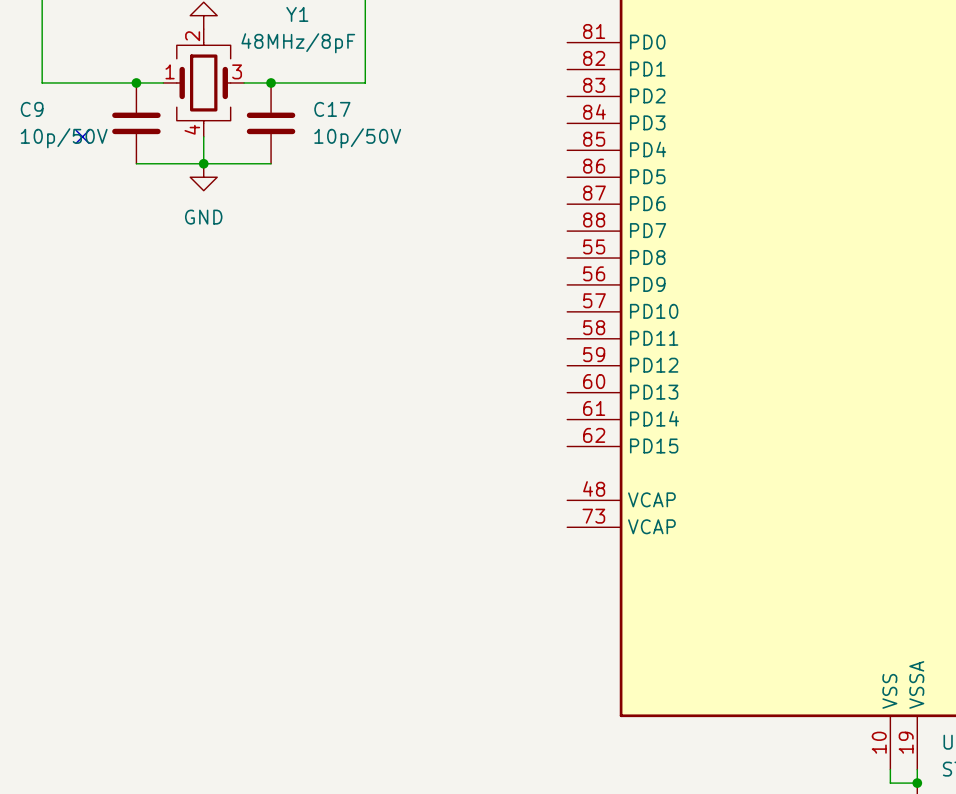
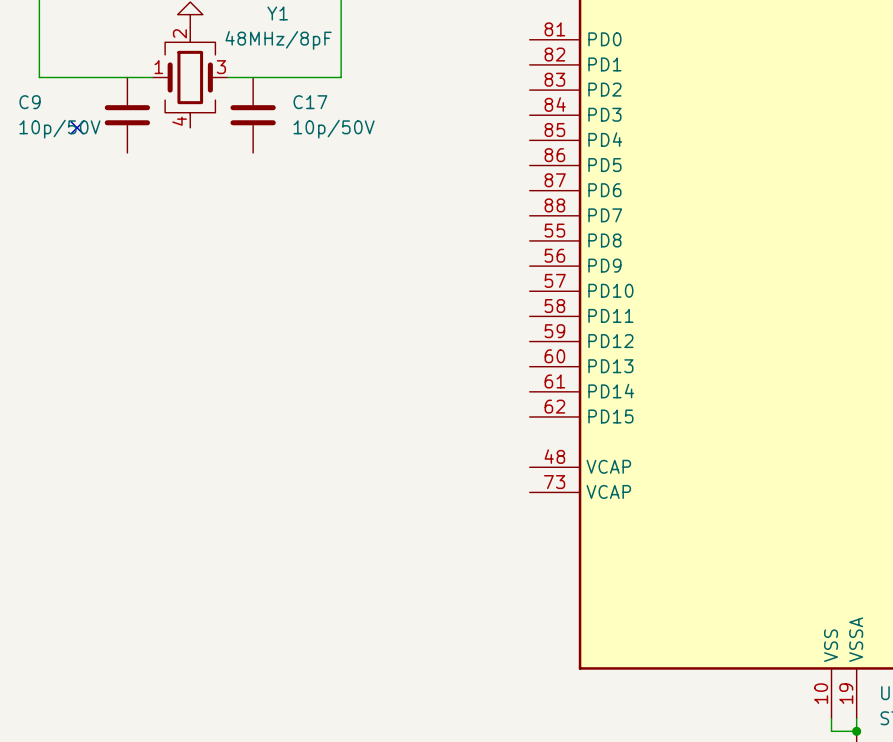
junction: (136, 82) -> none
junction: (271, 82) -> none
wire: (203, 136) (203, 163) -> none
wire: (136, 163) (271, 163) -> none
junction: (203, 163) -> none
power symbol: GND (203, 177) -> none

